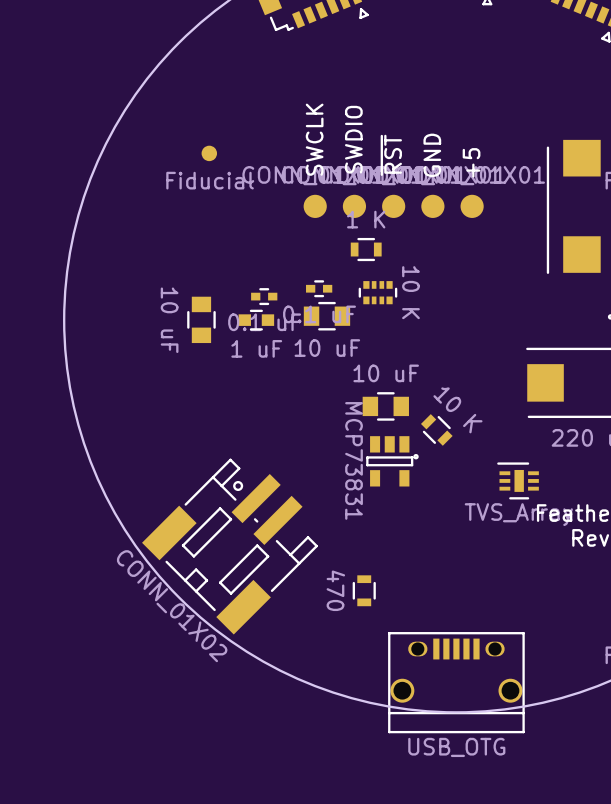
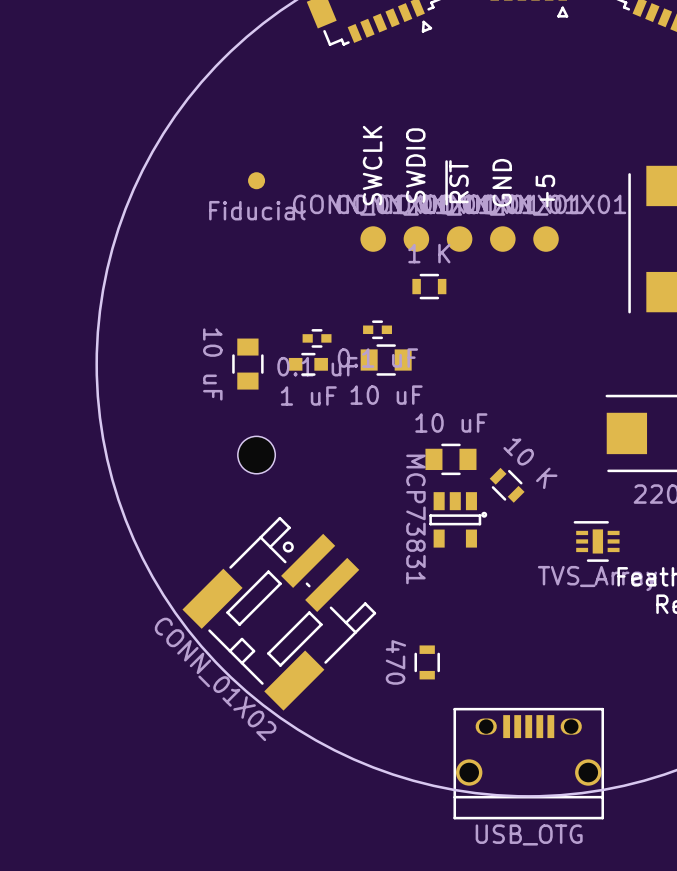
part: 10 K (377, 292) -> none
part: none -> (256, 455)

